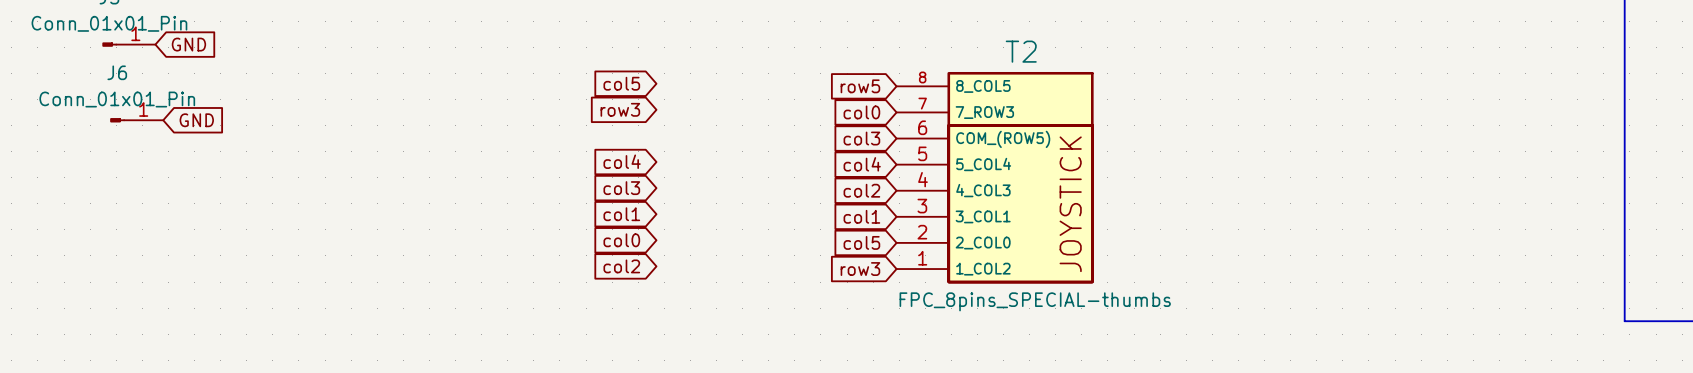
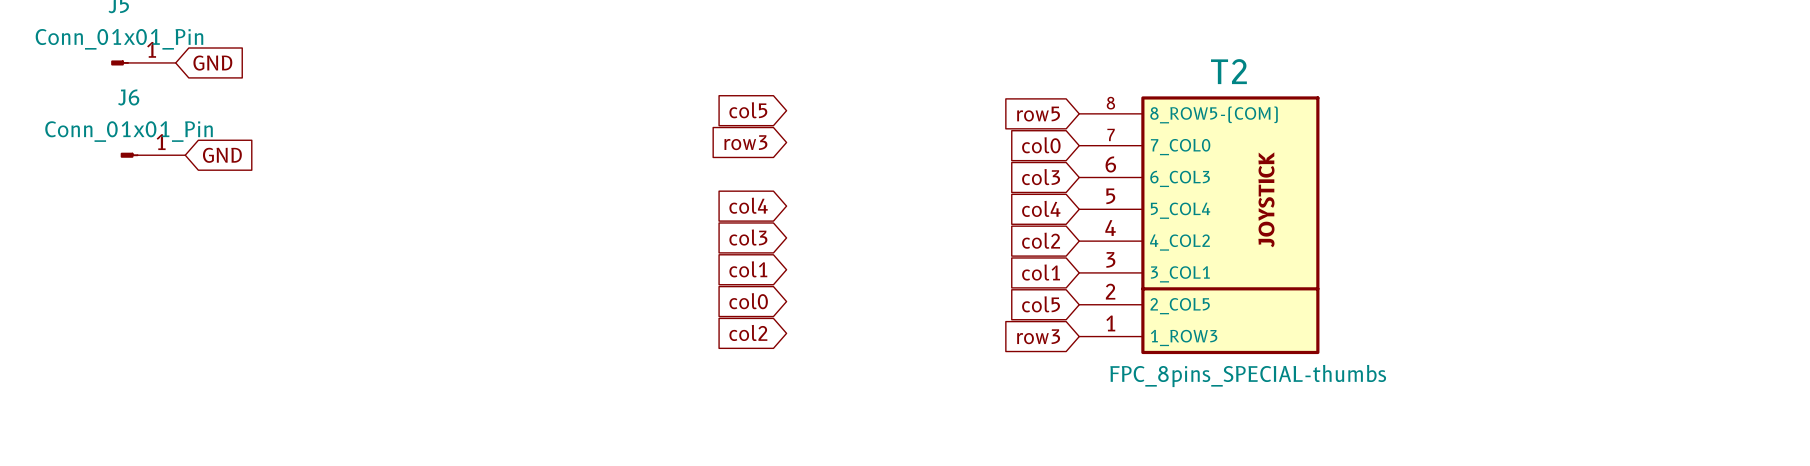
T2 symbol: [896, 71, 1094, 284] -> [1079, 96, 1320, 355]

